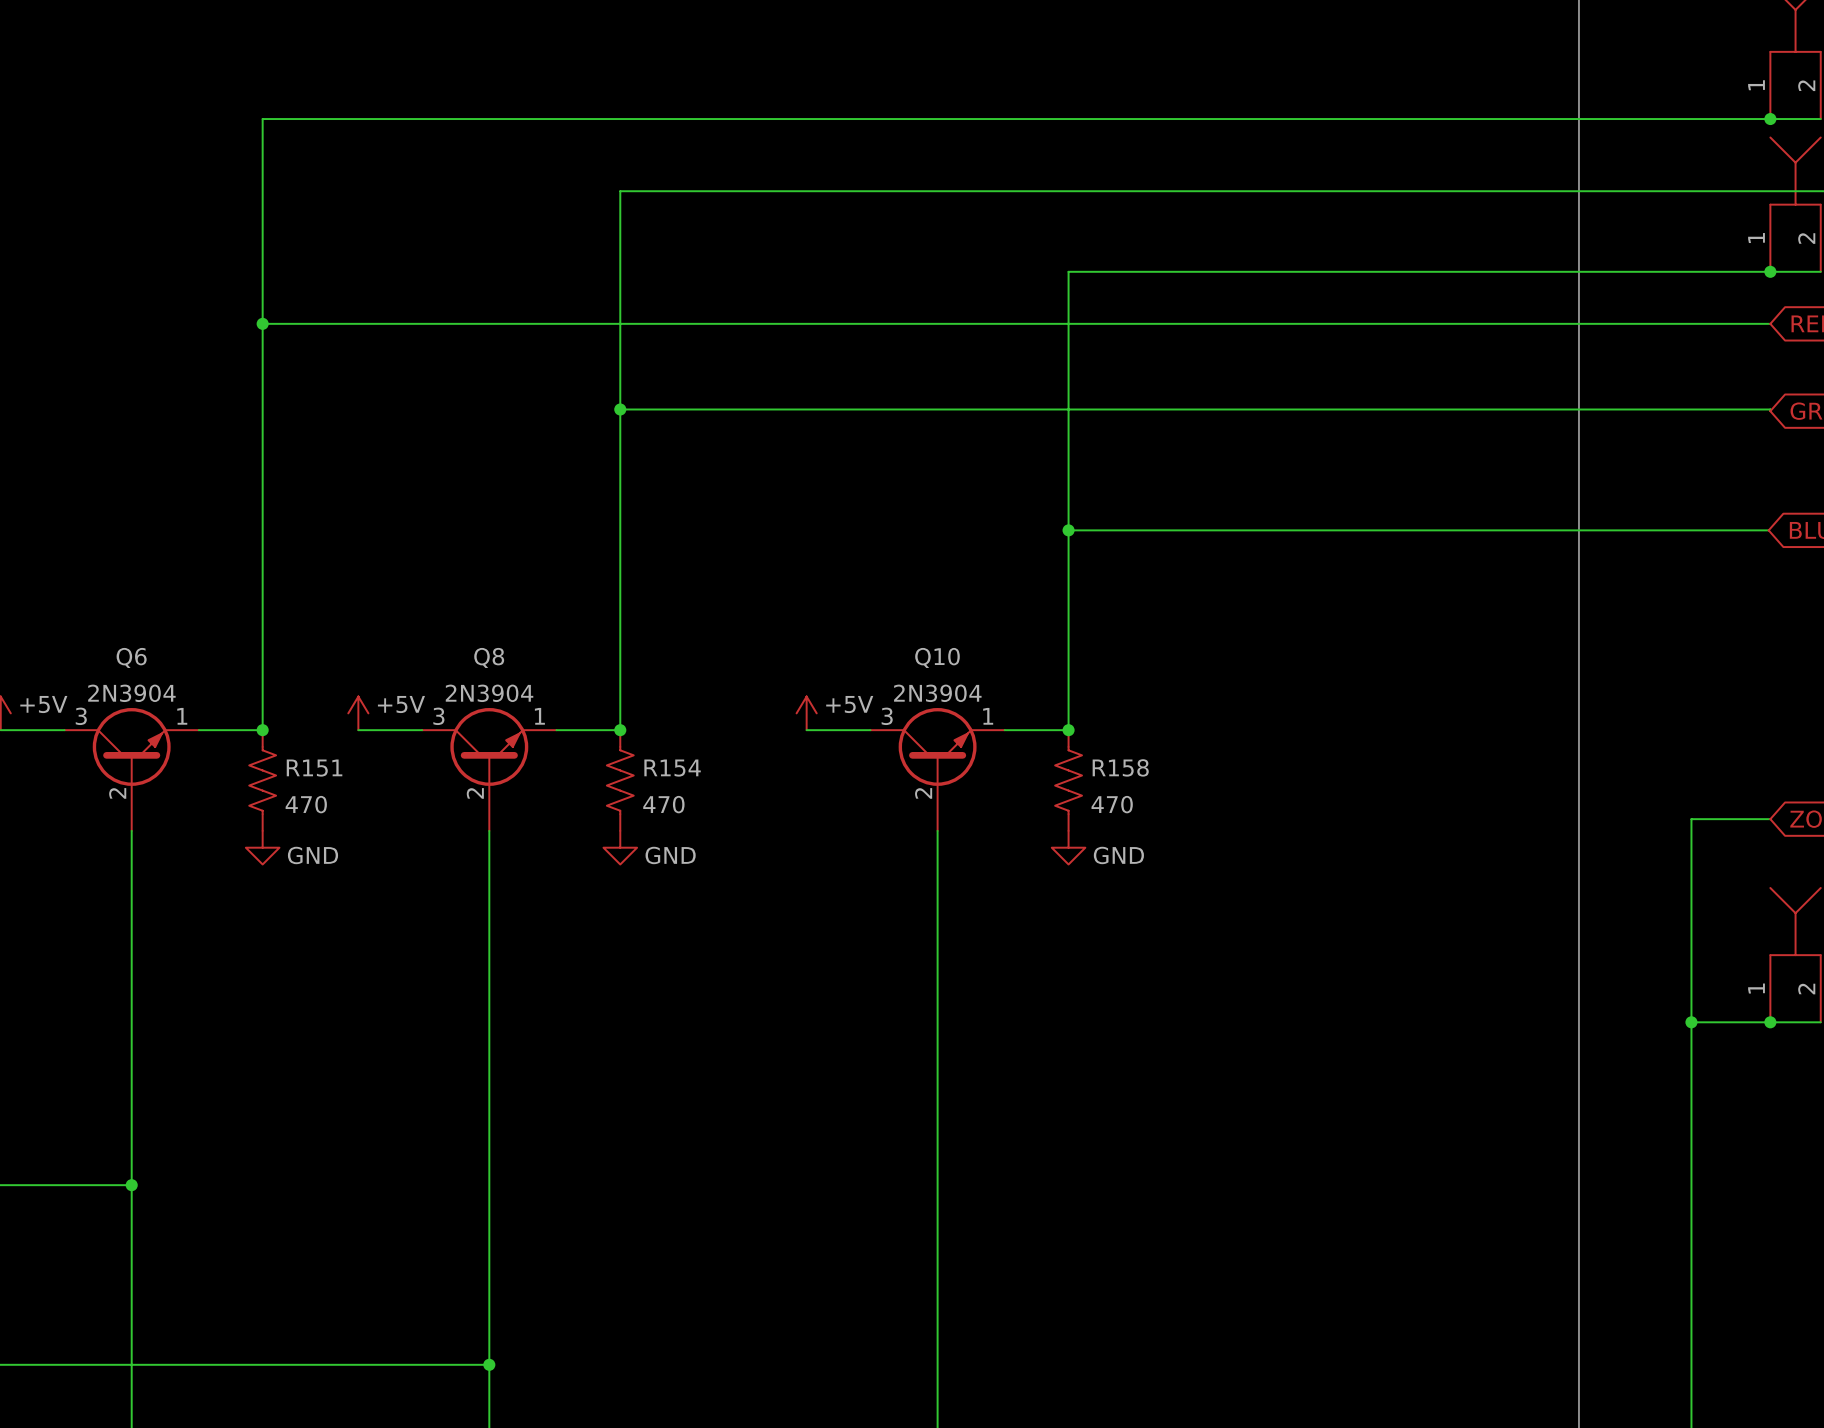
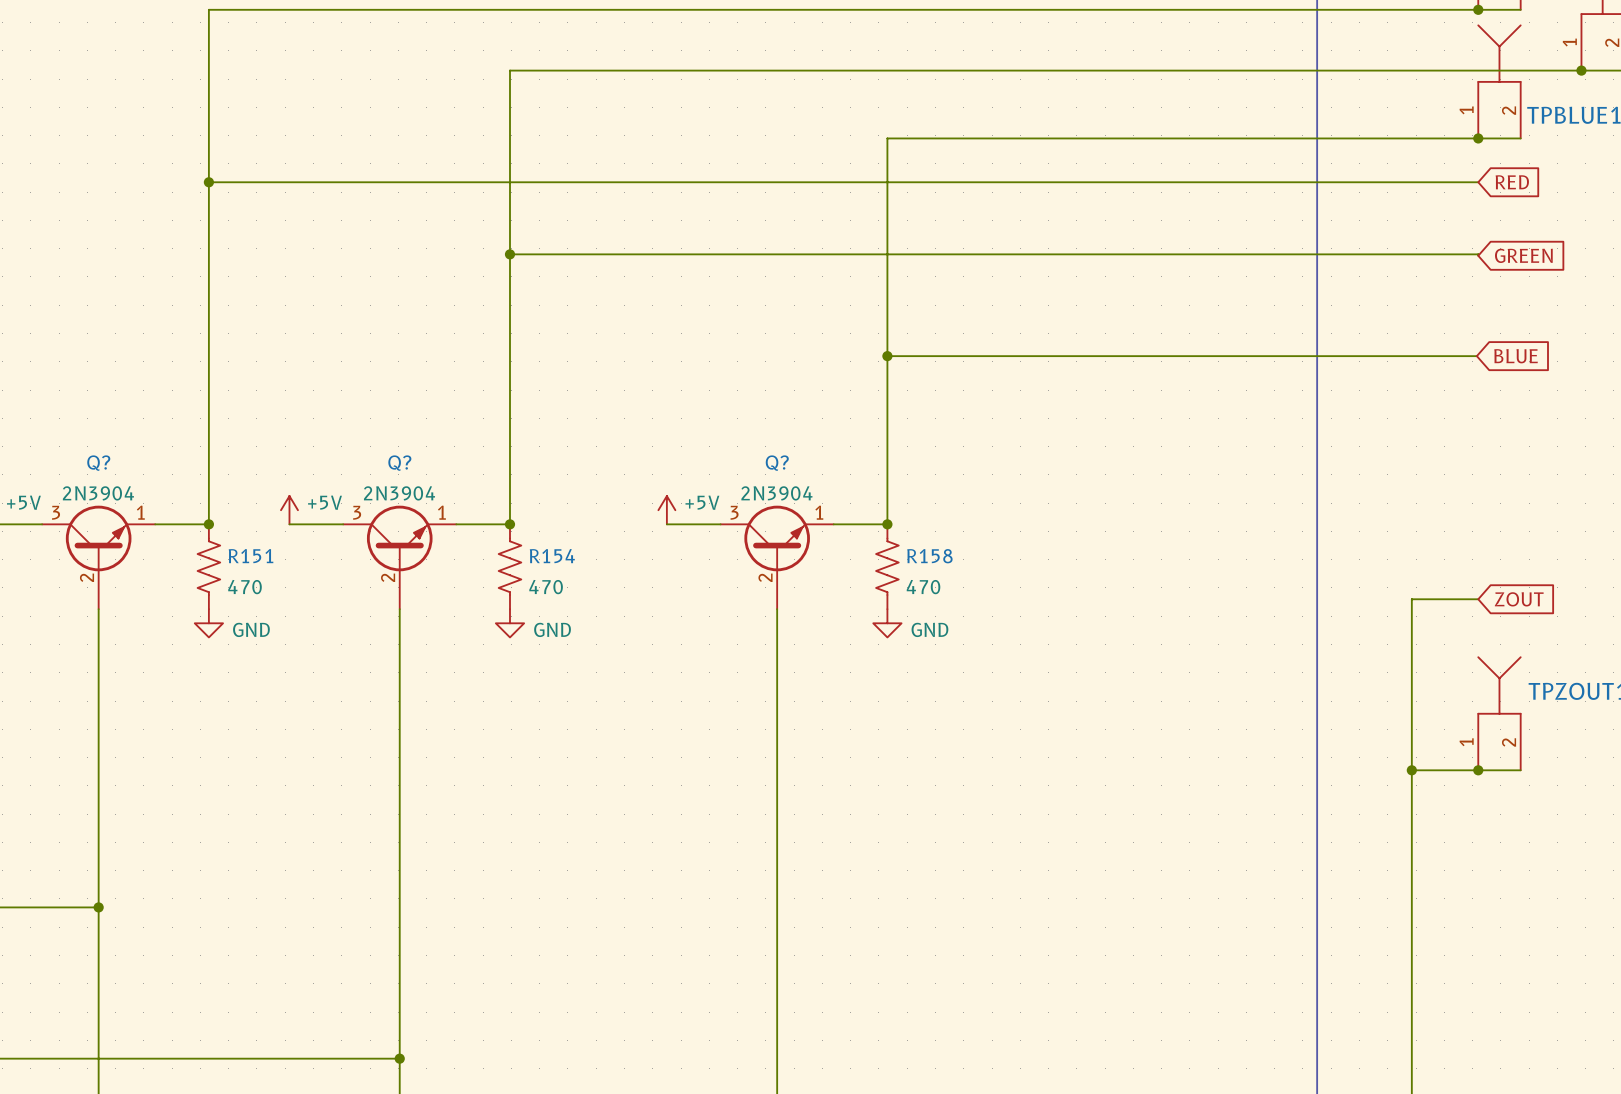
Q6 name: Q6 (131, 657) -> Q? (98, 463)
Q8 name: Q8 (489, 657) -> Q? (399, 463)
Q10 name: Q10 (937, 657) -> Q? (777, 463)

